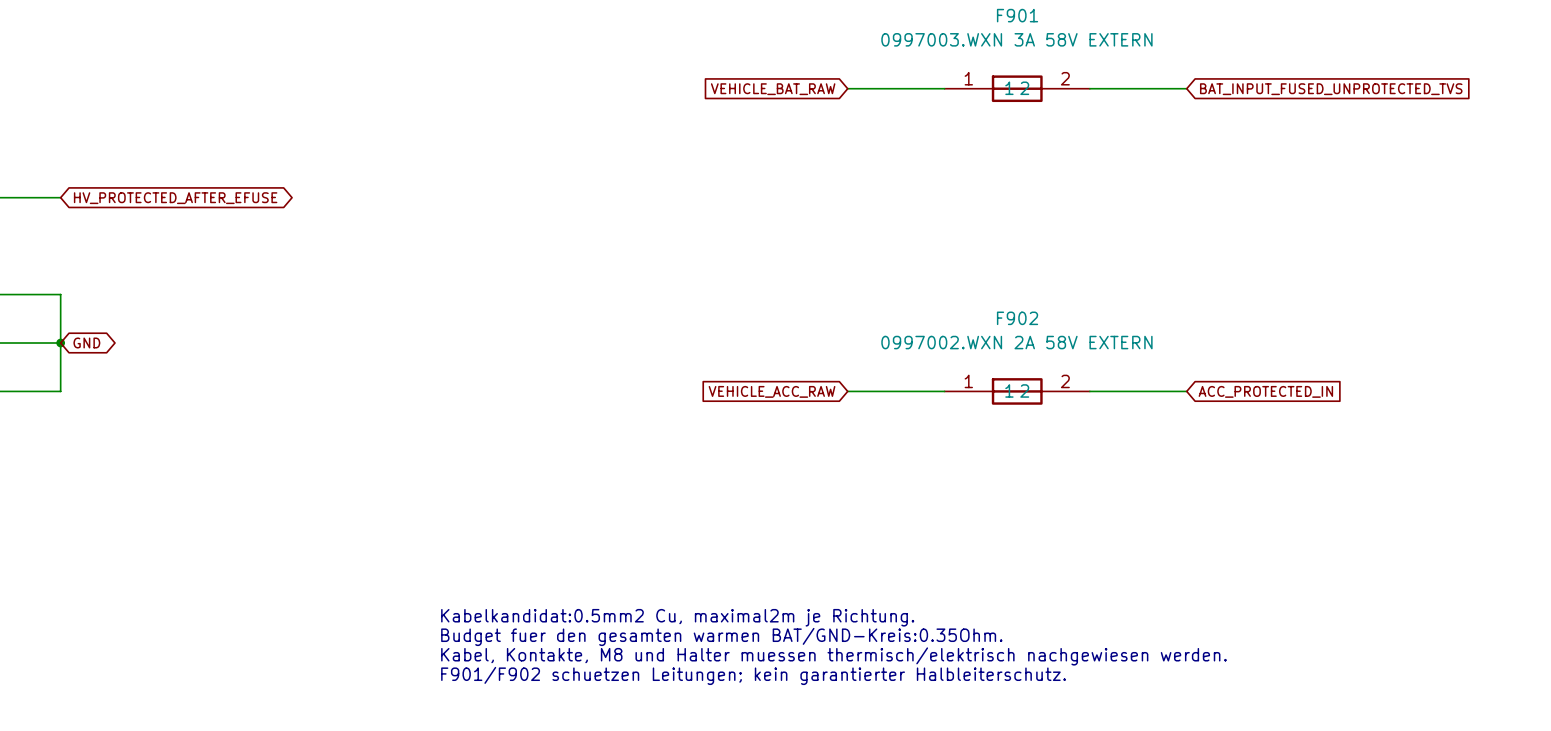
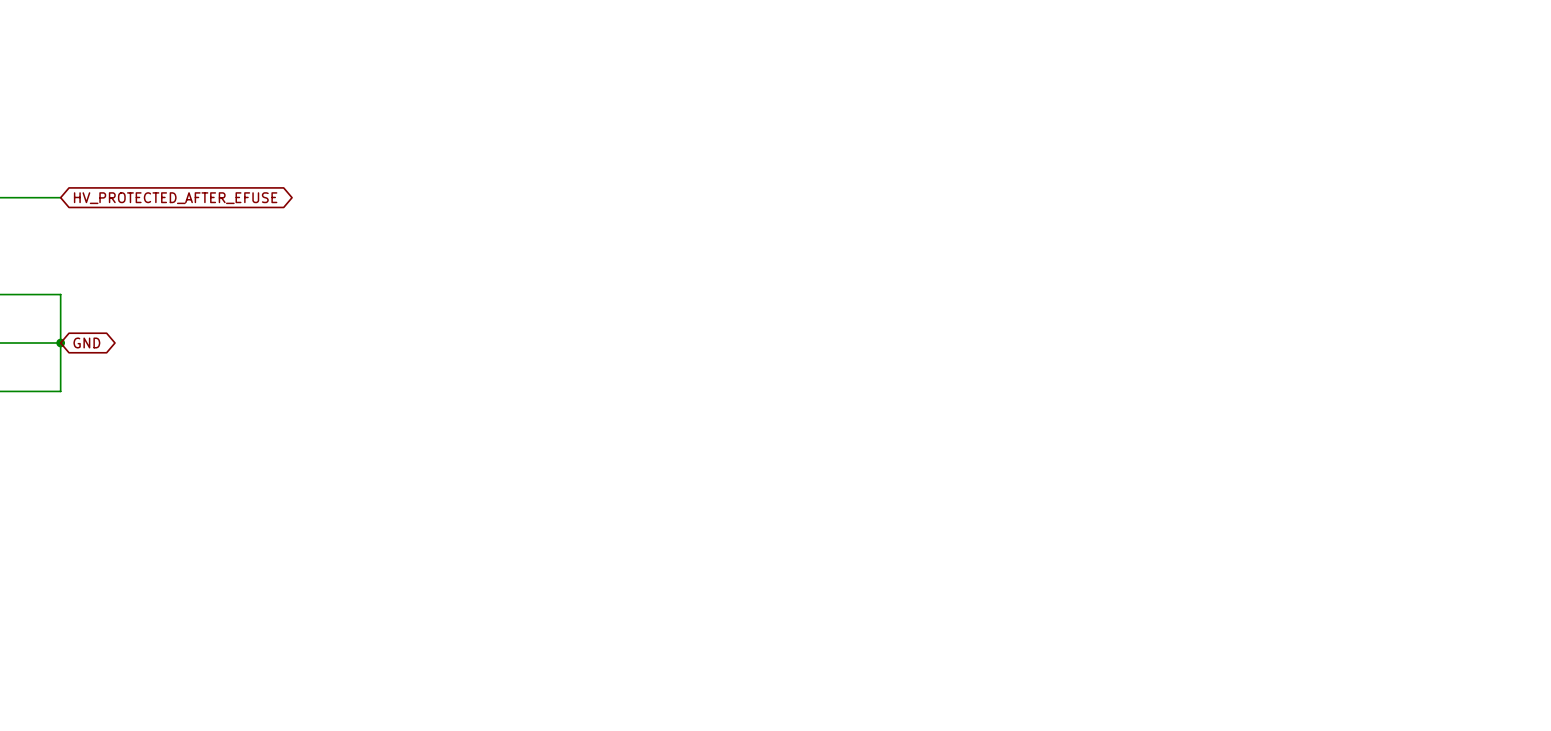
wire: (847, 88) (944, 88) -> none
F901: 0997003.WXN 3A 58V EXTERN (1017, 88) -> none
wire: (1089, 88) (1186, 88) -> none
global label: VEHICLE_BAT_RAW (773, 89) -> none
global label: BAT_INPUT_FUSED_UNPROTECTED_TVS (1331, 89) -> none
global label: VEHICLE_ACC_RAW (772, 391) -> none
wire: (847, 391) (944, 391) -> none
F902: 0997002.WXN 2A 58V EXTERN (1017, 391) -> none
wire: (1089, 391) (1186, 391) -> none
global label: ACC_PROTECTED_IN (1265, 391) -> none
text: Kabelkandidat:0.5mm2 Cu, maximal2m je Richtung. (677, 617) -> none
text: Budget fuer den gesamten warmen BAT/GND-Kreis:0.35Ohm. (721, 636) -> none
text: Kabel, Kontakte, M8 und Halter muessen thermisch/elektrisch nachgewiesen werden. (833, 656) -> none
text: F901/F902 schuetzen Leitungen; kein garantierter Halbleiterschutz. (753, 675) -> none

